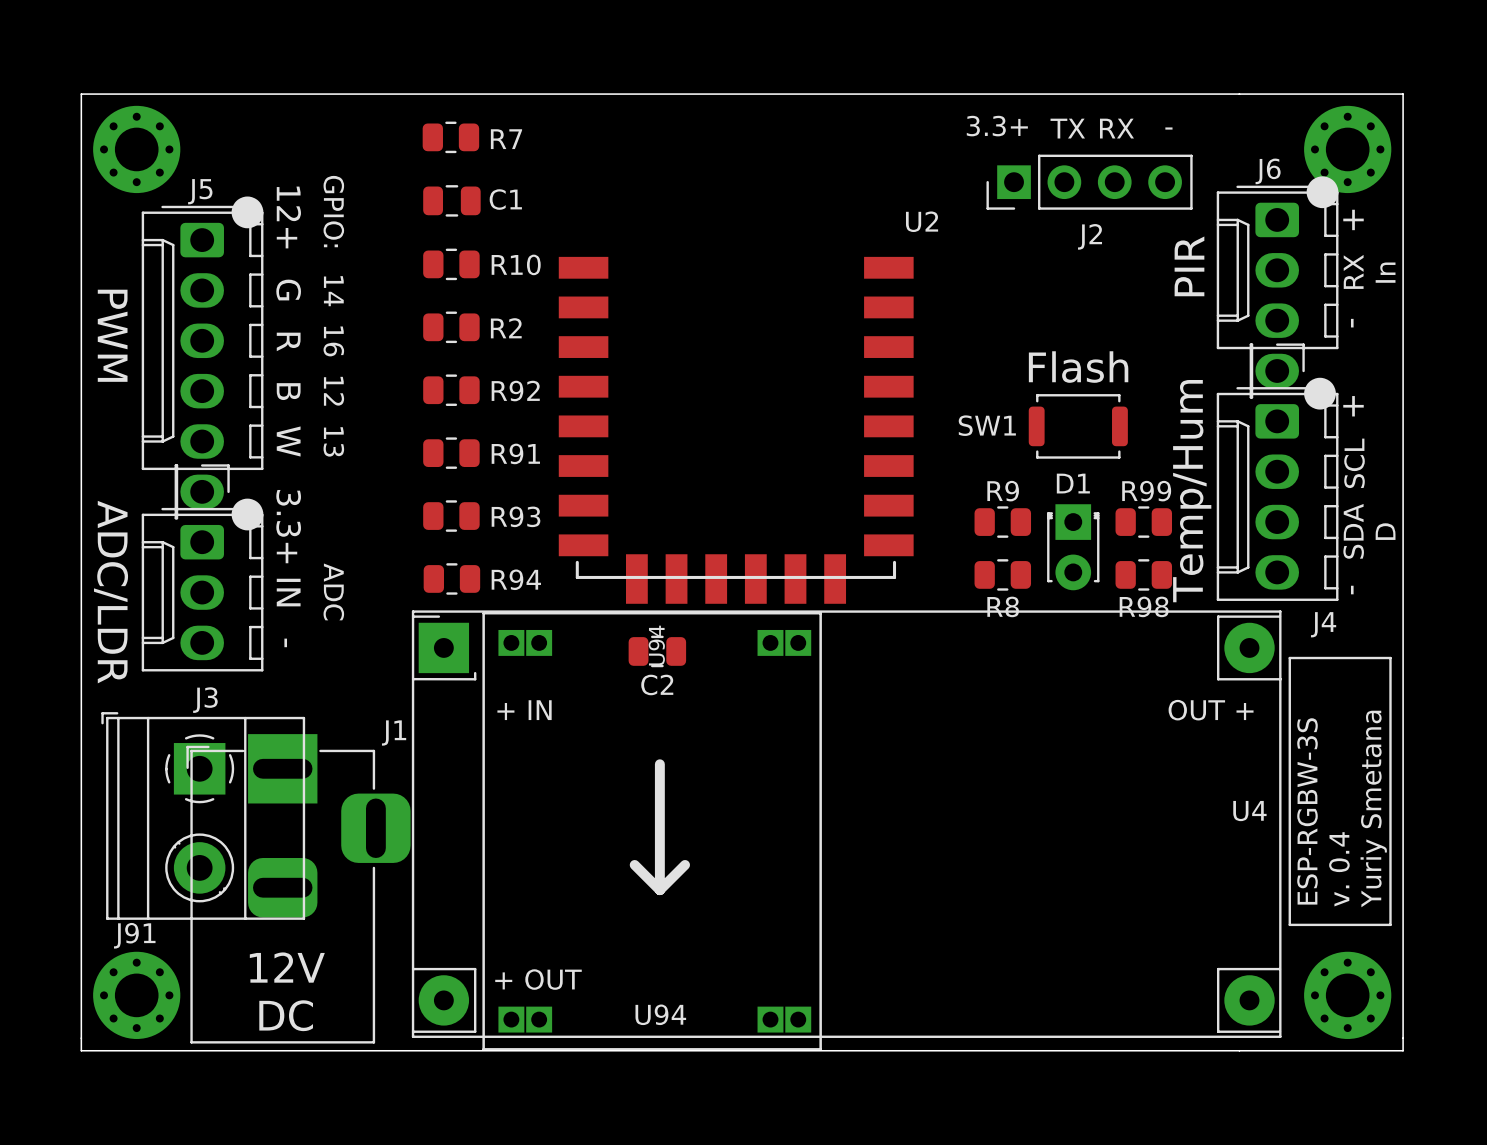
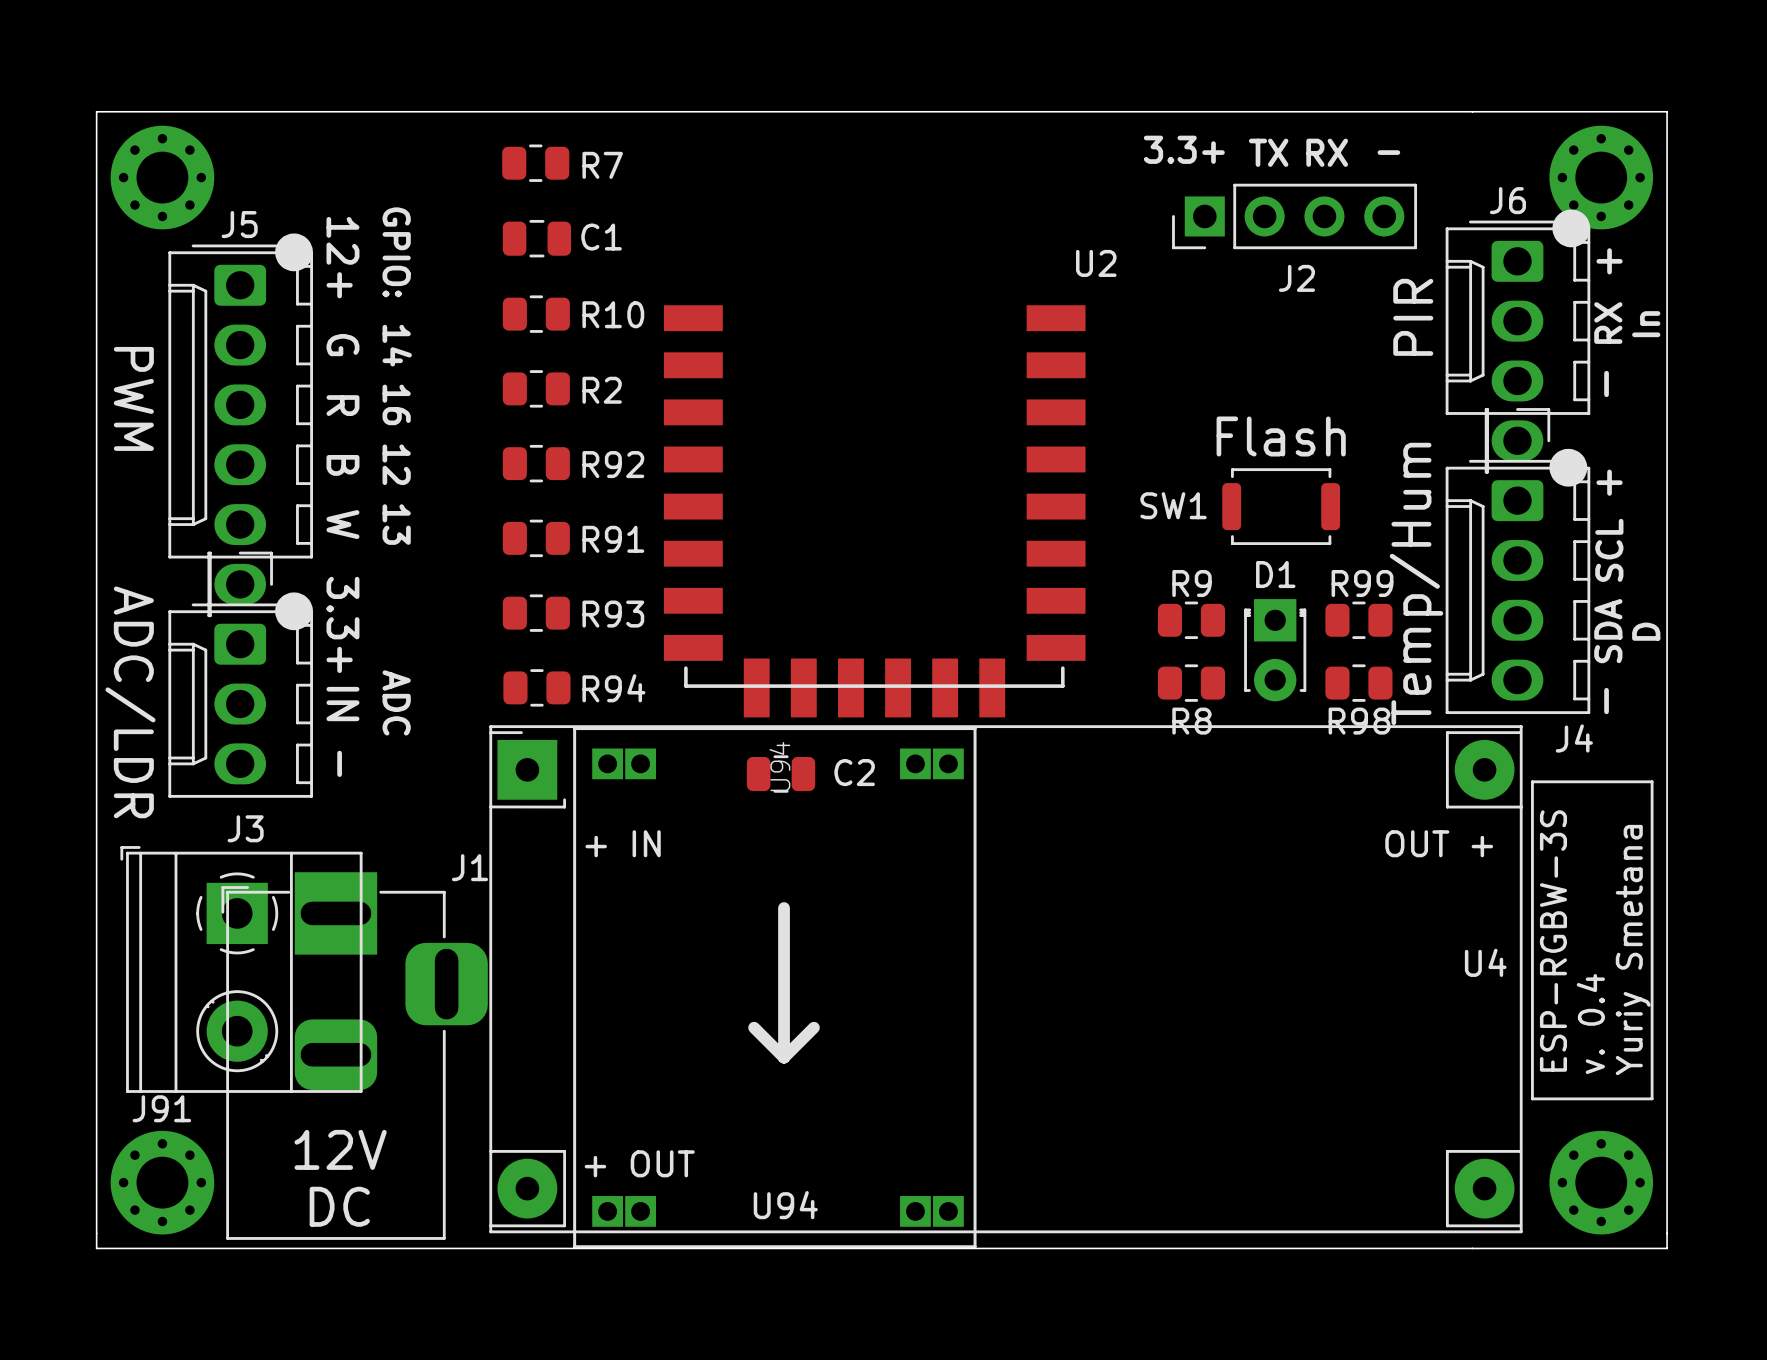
C2 name position: C2 (657, 684) -> C2 (854, 772)

